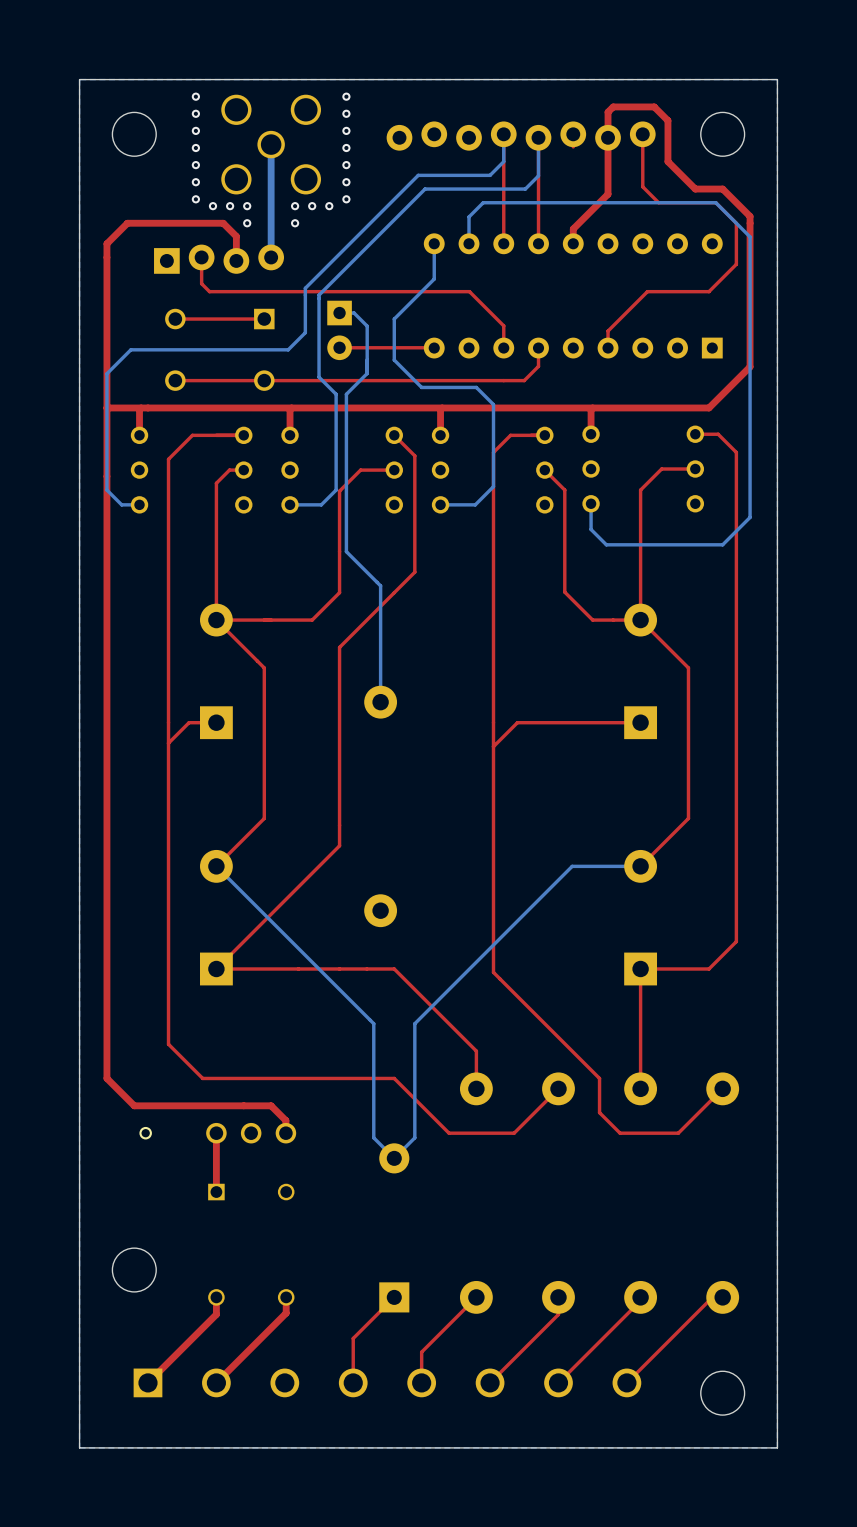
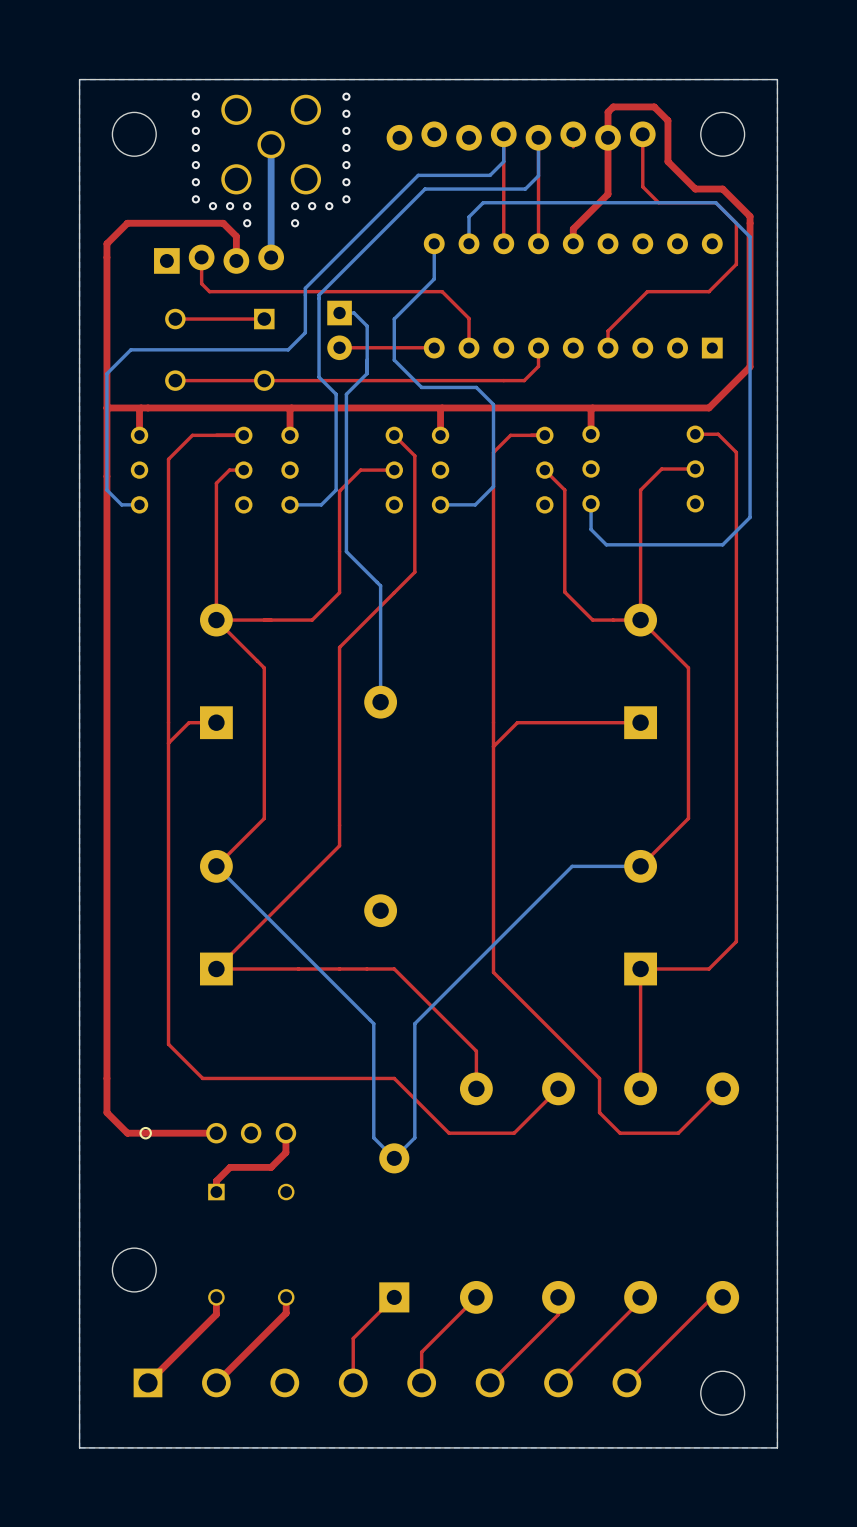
top track: (442, 291) (469, 291) (503, 325) (503, 348) -> (442, 291) (469, 318) (469, 348)
top track: (106, 1078) (134, 1105) (271, 1105) (285, 1120) (285, 1133) -> (106, 1078) (106, 1112) (127, 1133) (216, 1133)
top track: (216, 1133) (216, 1181) -> (285, 1133) (285, 1152) (271, 1167) (230, 1167) (216, 1181)

